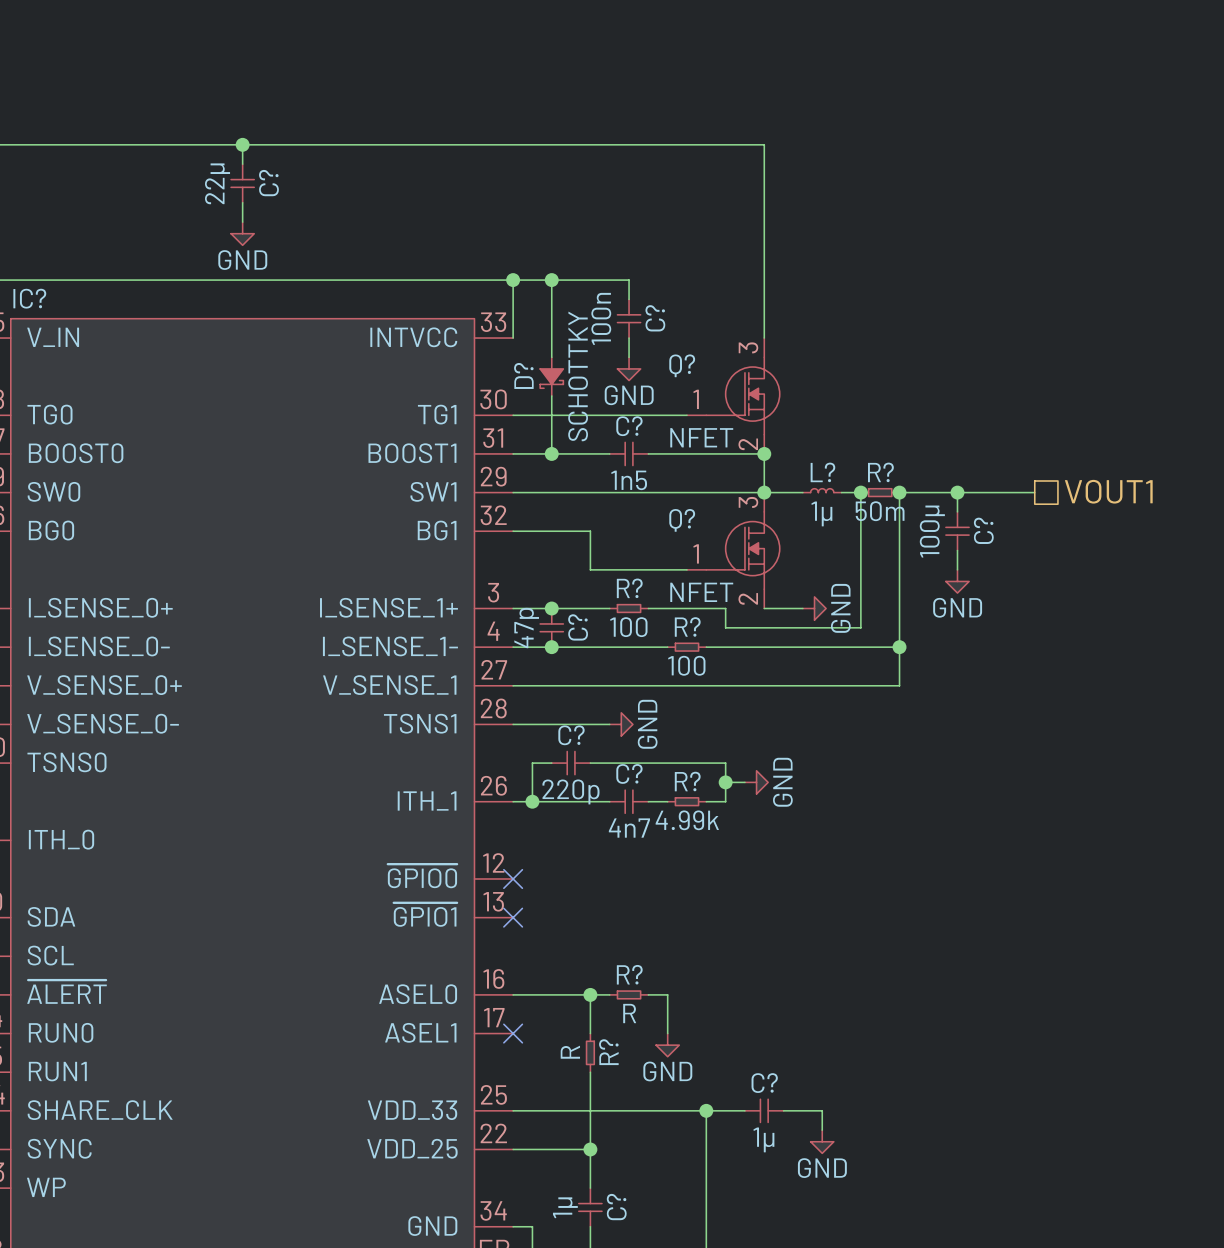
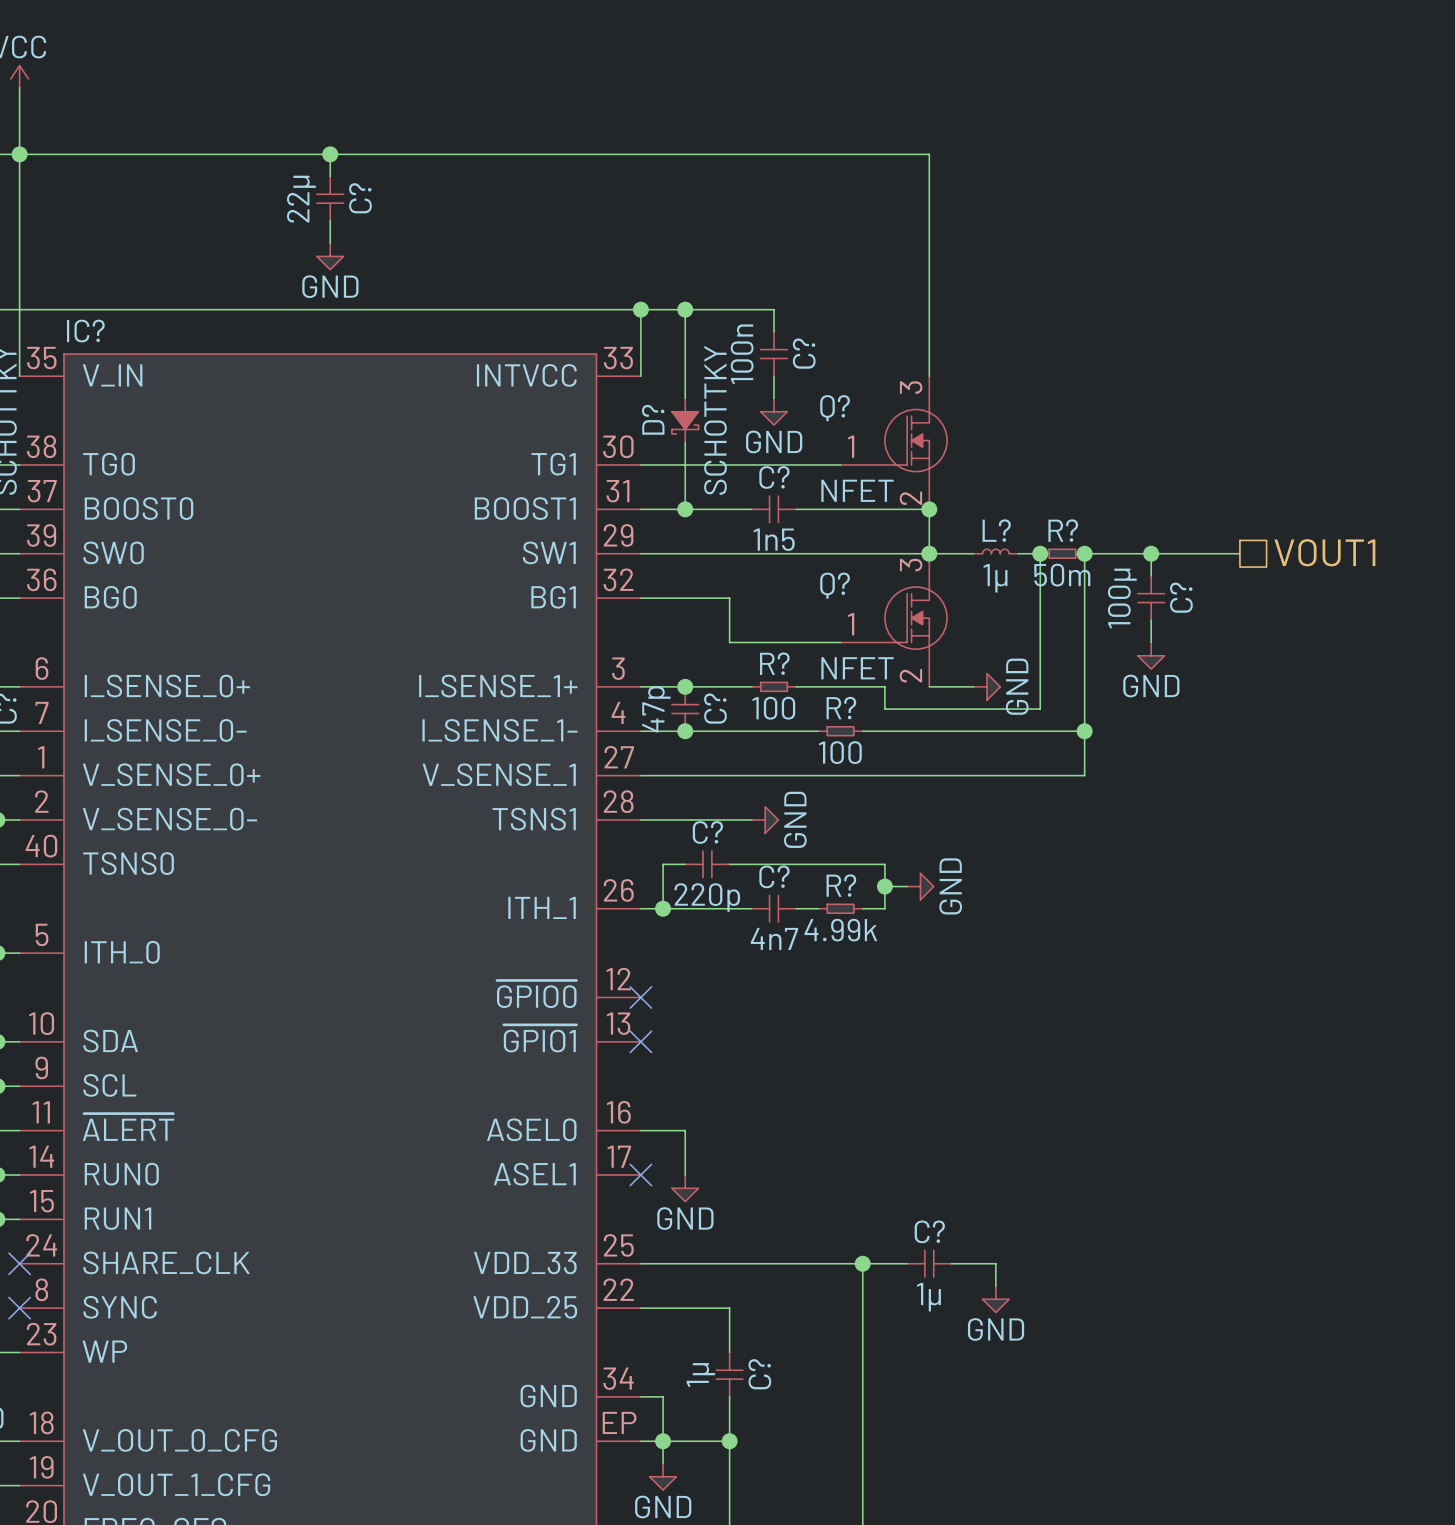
wire: (551, 994) (609, 994) -> (685, 1130) (685, 1175)
wire: (590, 994) (590, 1033) -> none
junction: (590, 994) -> none
R?: R (629, 994) -> none
wire: (648, 994) (667, 994) (667, 1033) -> none
power symbol position: GND (667, 1045) -> GND (685, 1188)
R?: R (590, 1052) -> none
wire: (590, 1072) (590, 1149) -> none
junction: (590, 1149) -> none

